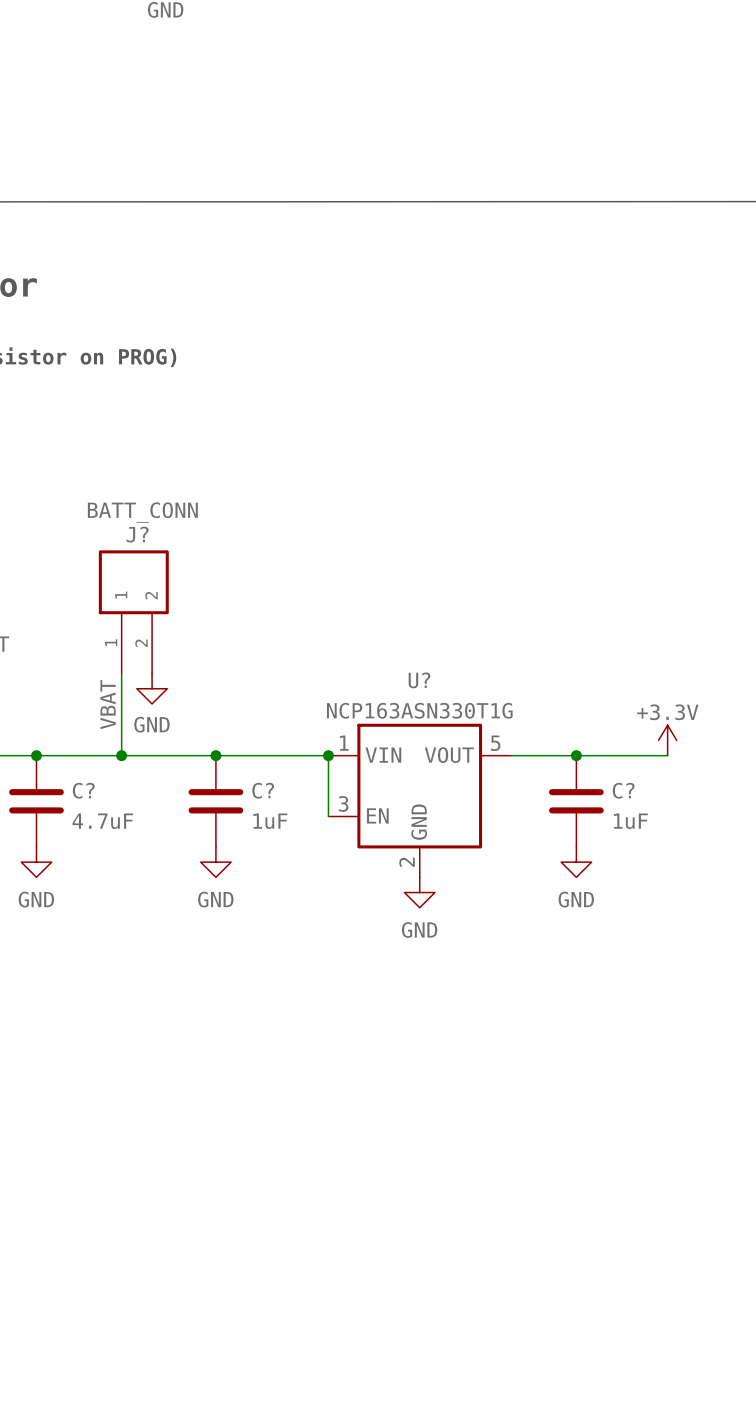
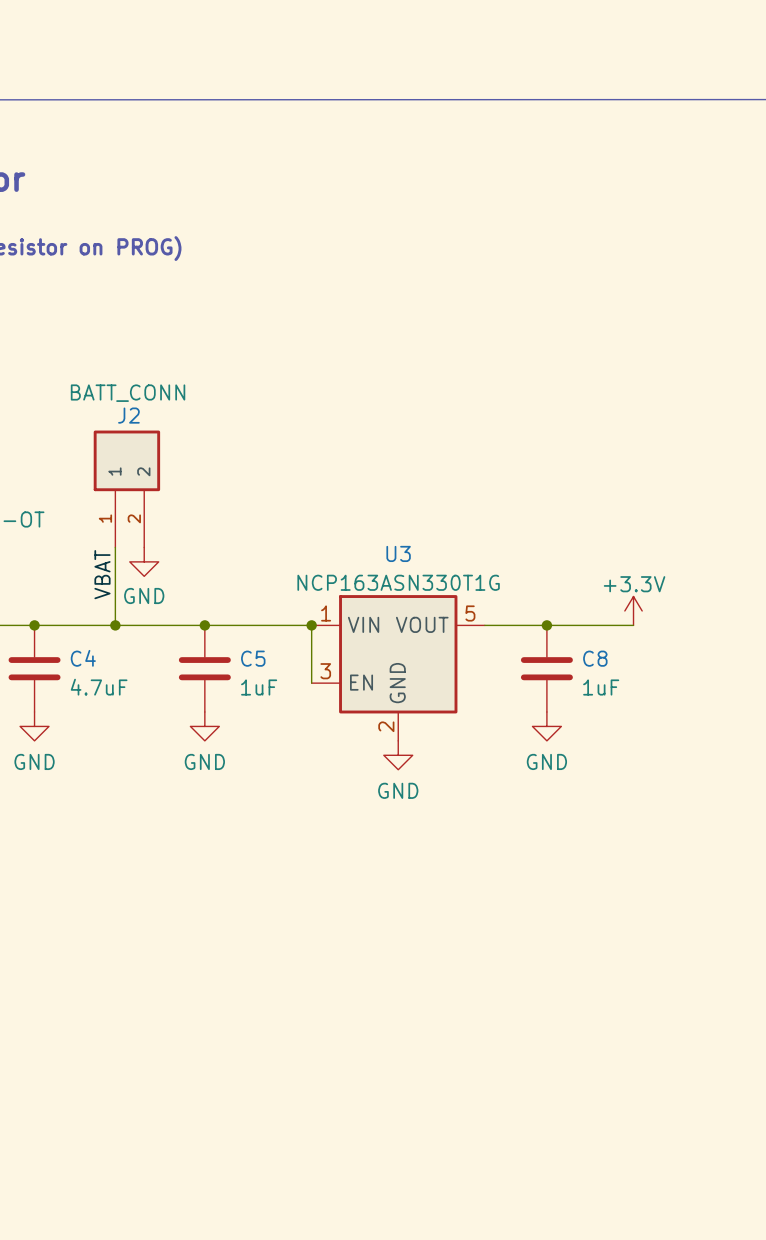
J? name: J? (137, 534) -> J2 (128, 415)
U? name: U? (419, 680) -> U3 (398, 553)
C? name: C? (83, 790) -> C4 (83, 658)
C? name: C? (263, 790) -> C5 (253, 658)
C? name: C? (623, 790) -> C8 (595, 658)

